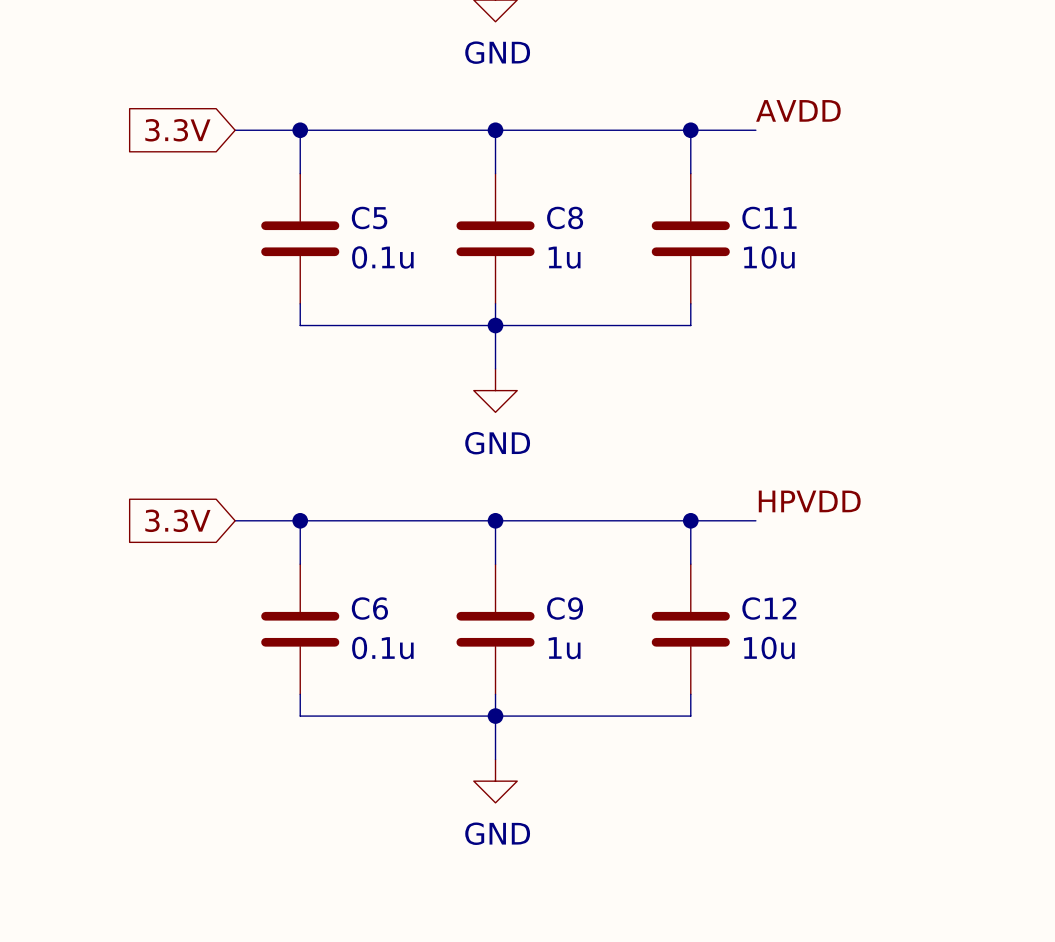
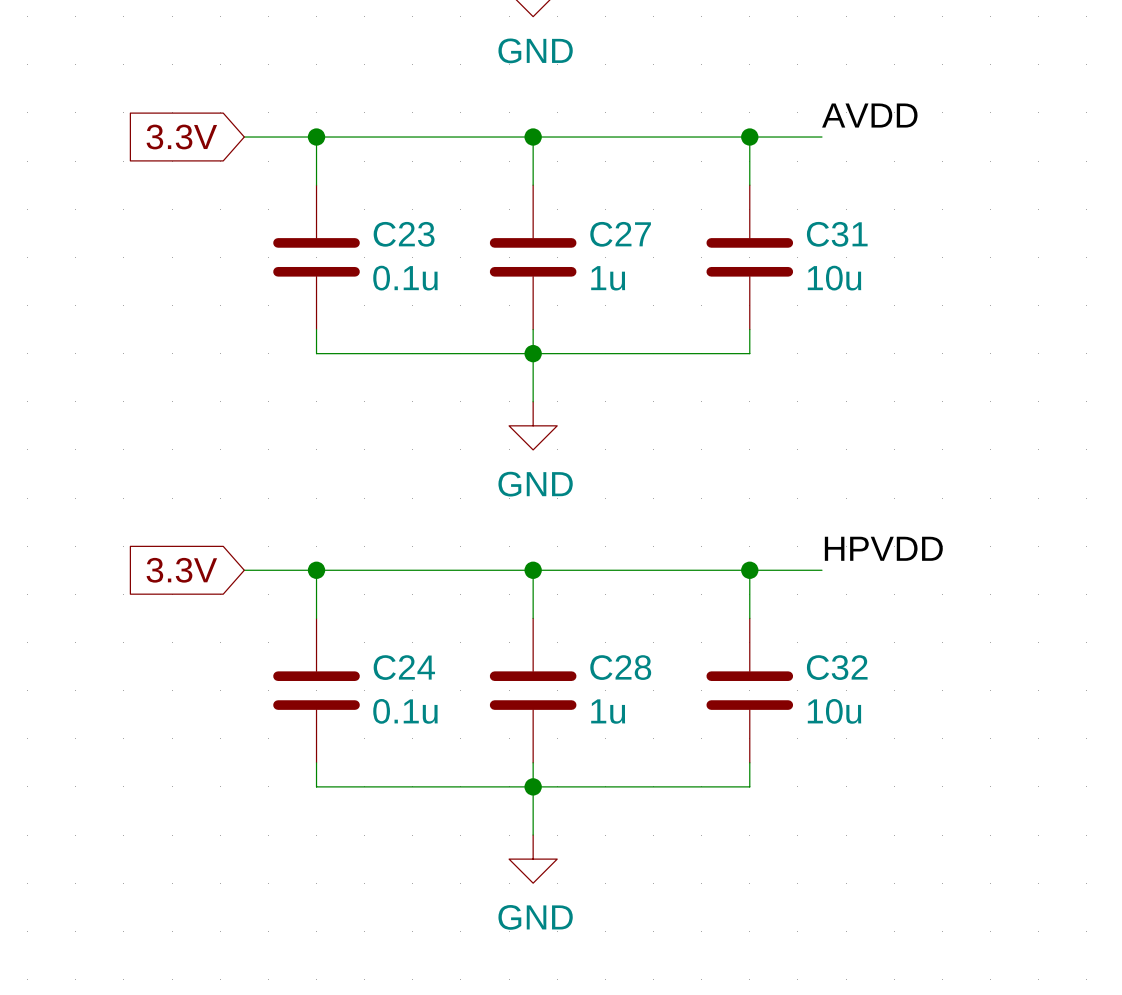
C5 name: C5 (369, 217) -> C23 (404, 234)
C8 name: C8 (565, 217) -> C27 (620, 234)
C11 name: C11 (769, 217) -> C31 (837, 234)
C6 name: C6 (369, 608) -> C24 (404, 667)
C9 name: C9 (565, 608) -> C28 (620, 667)
C12 name: C12 (769, 608) -> C32 (837, 667)

